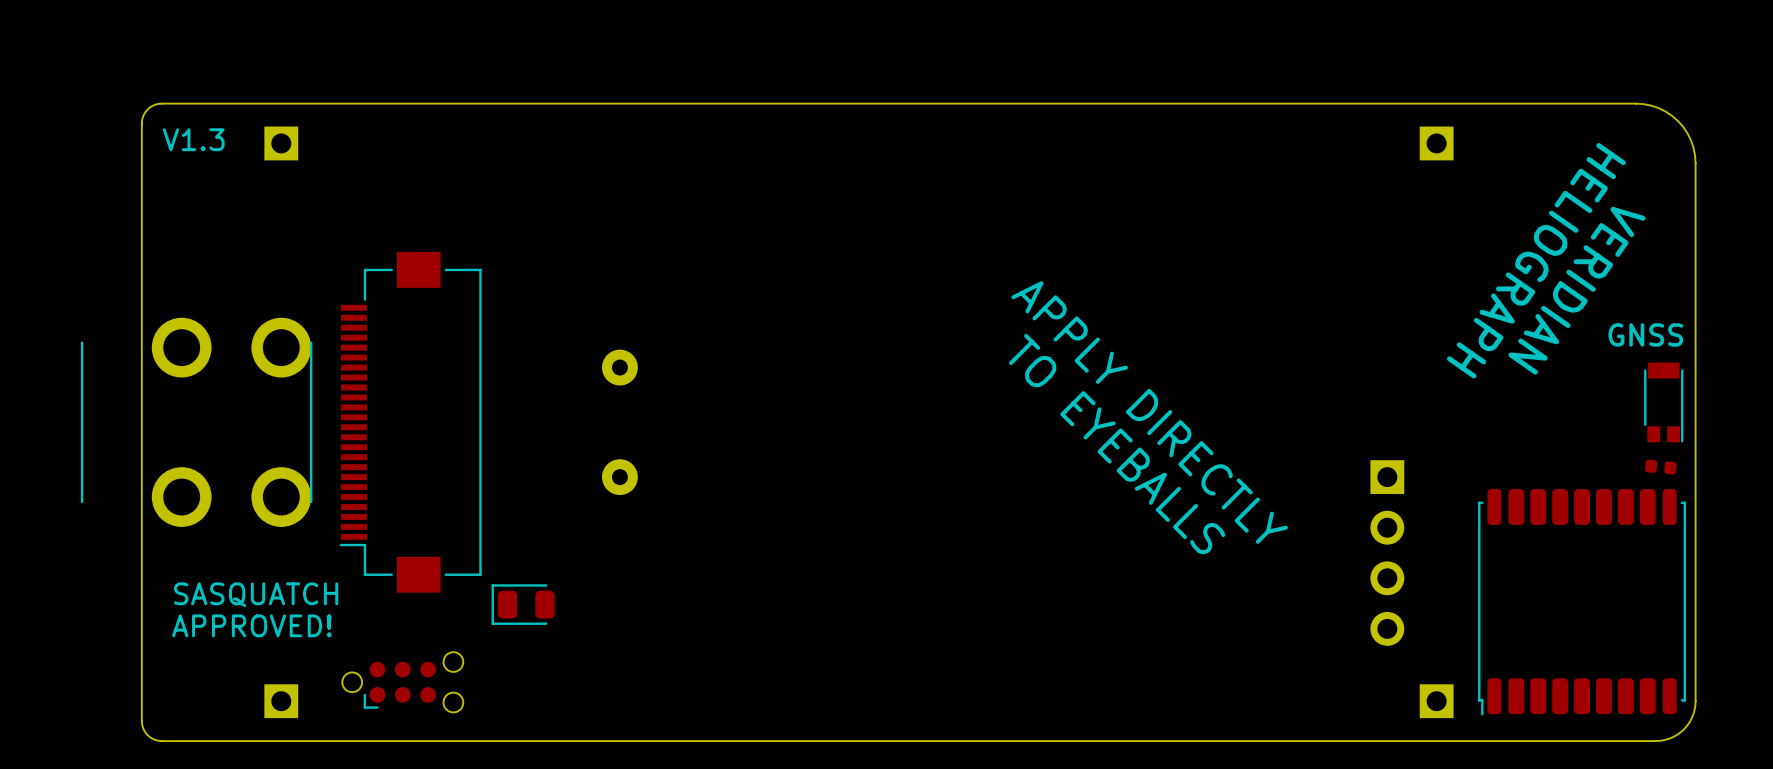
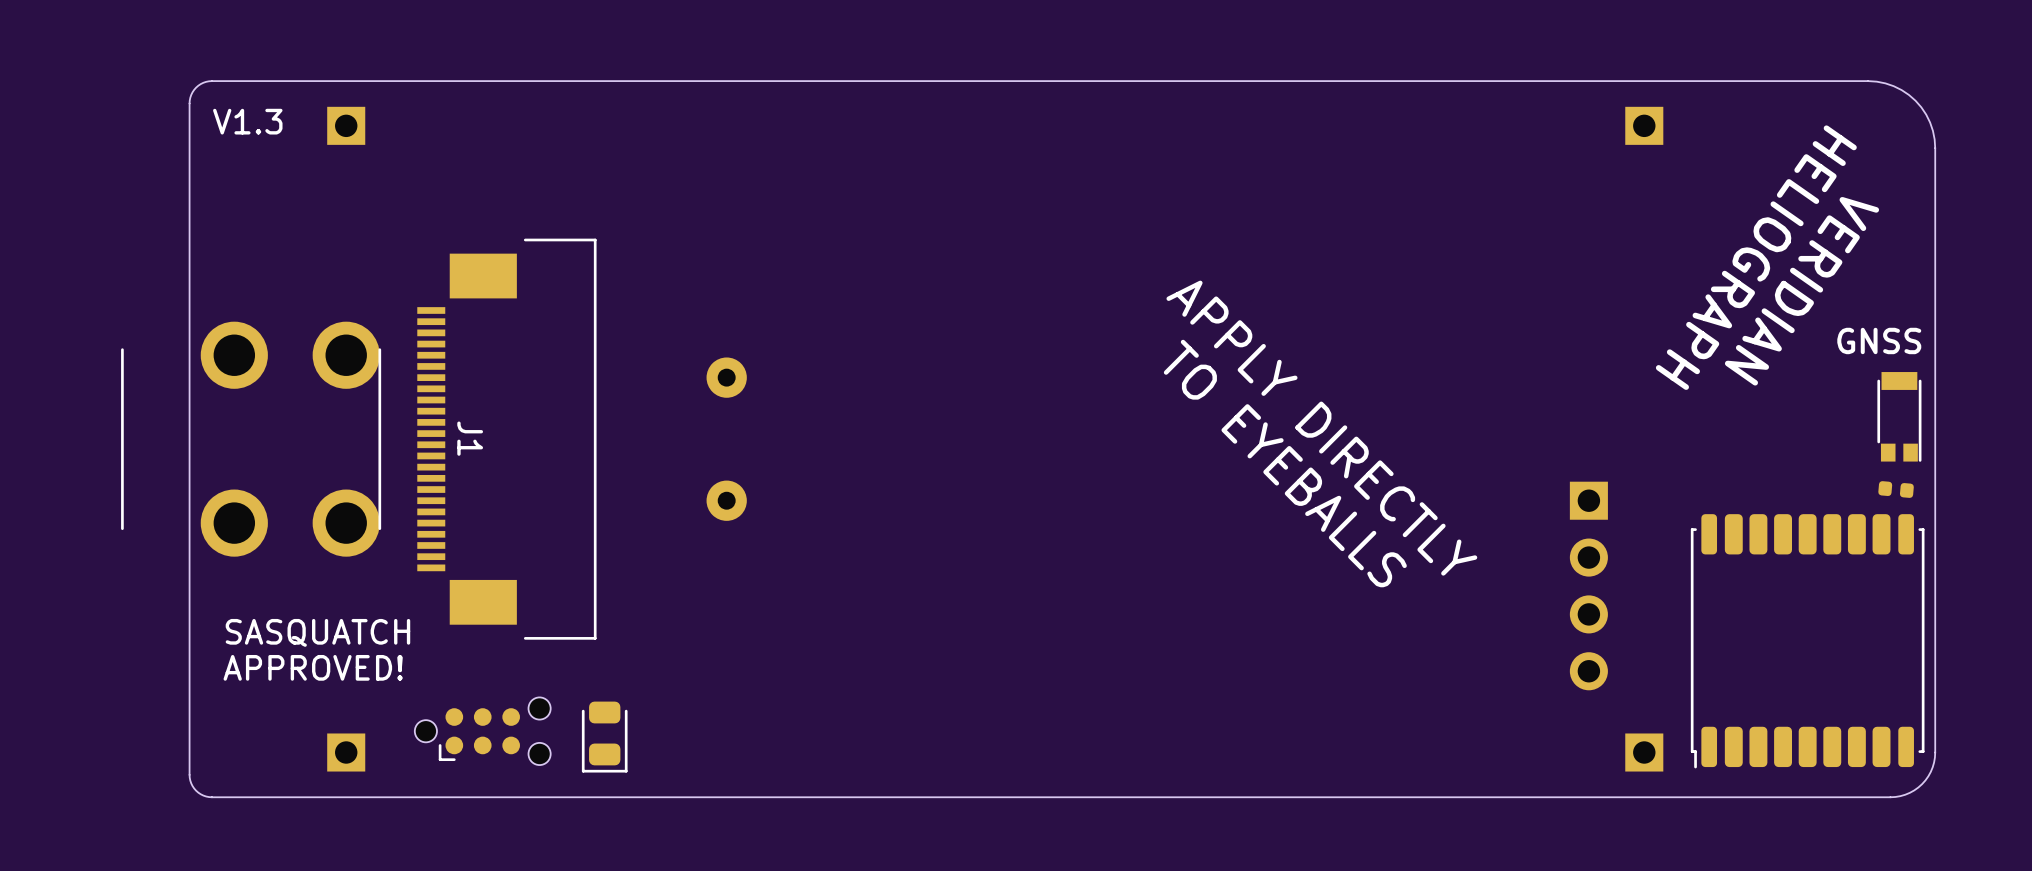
part: (410, 422) -> none
J1: none -> (506, 439)
part rotation: 0° (523, 604) -> 90° counterclockwise (604, 737)
part position: (523, 604) -> (604, 737)

